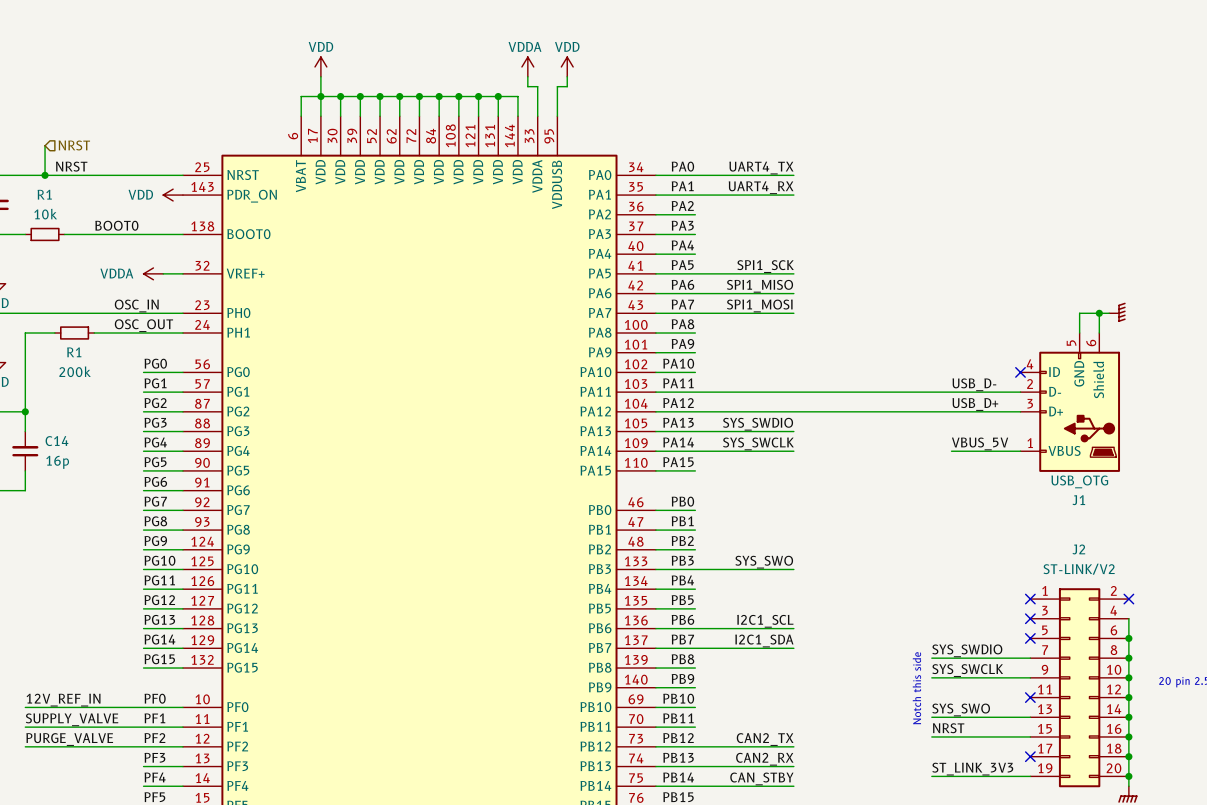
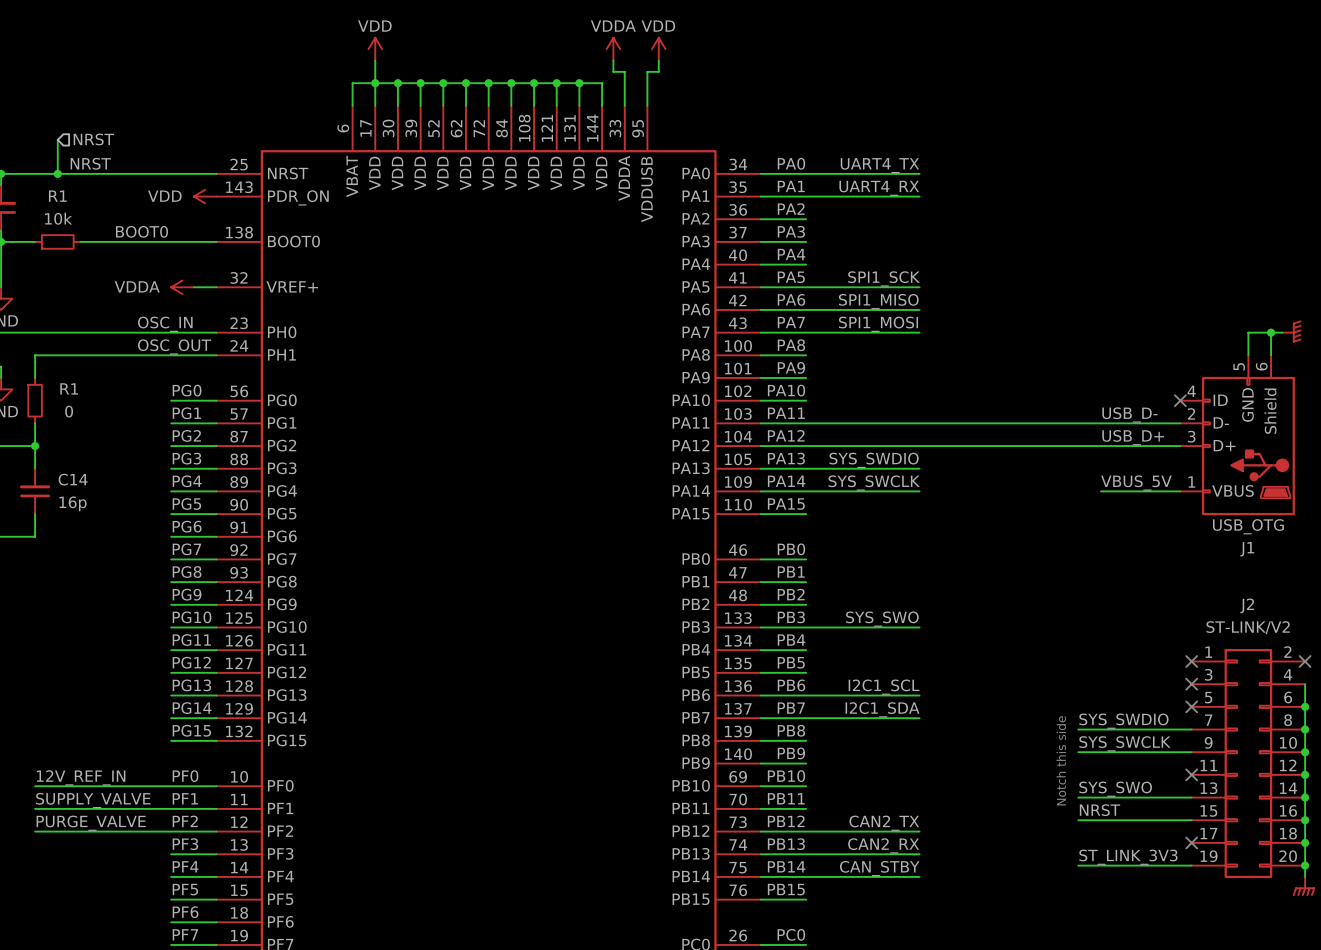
wire: none -> (69, 355) (114, 355)
R1: 200k (74, 333) -> none
wire: (25, 352) (25, 392) -> none
R1: none -> 0 (35, 400)

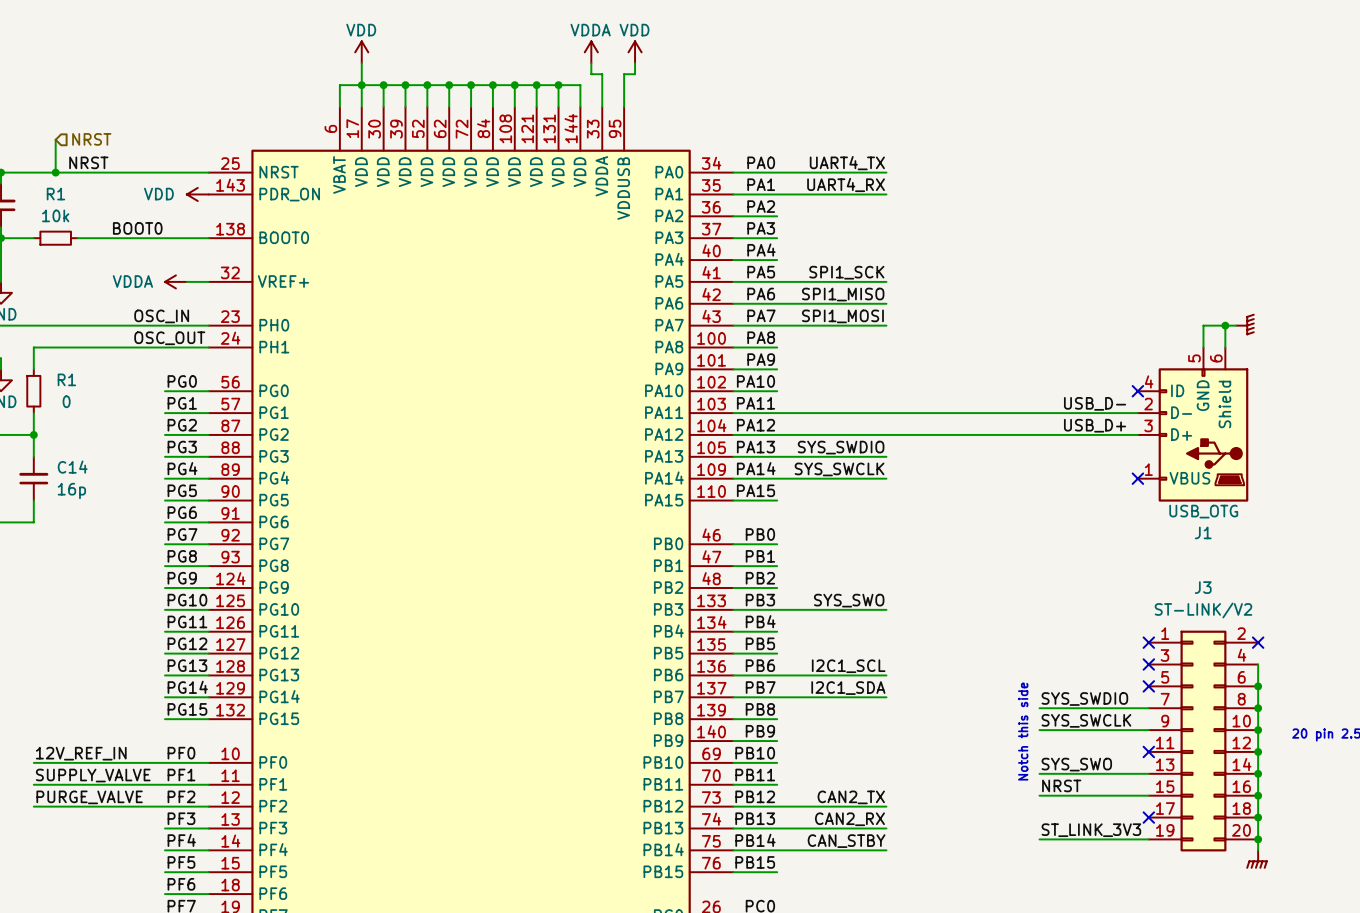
label: VBUS_5V (1136, 483) -> none
wire: (1100, 491) (1180, 491) -> none
no-connect mark: none -> (1137, 478)
J2 name: J2 (1247, 605) -> J3 (1203, 587)

